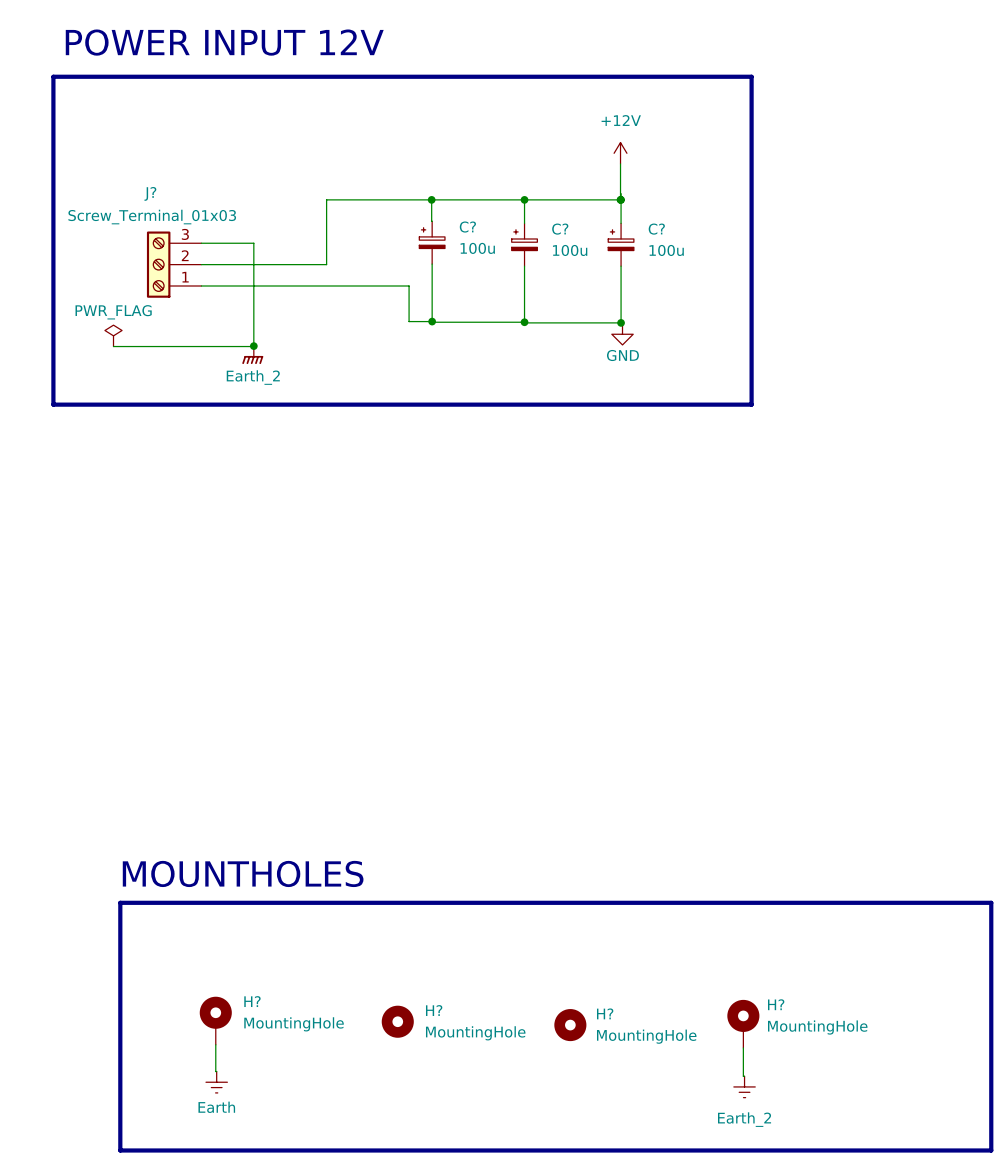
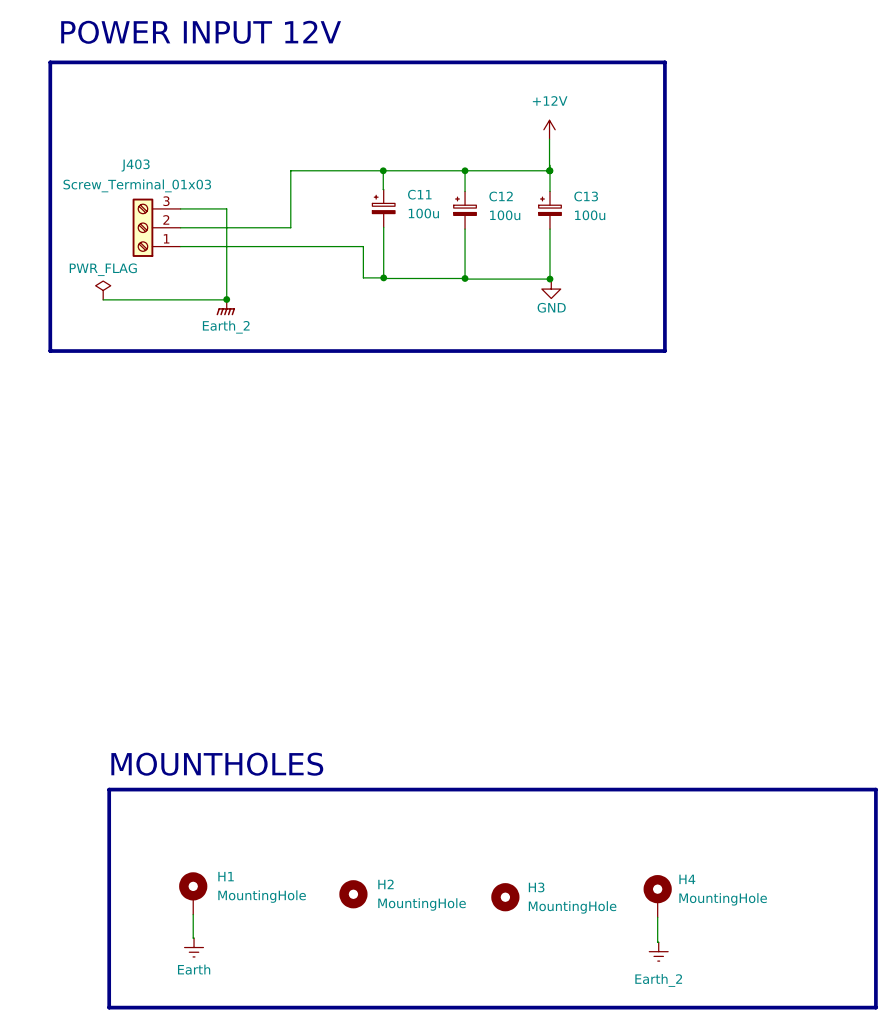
J? name: J? (150, 193) -> J403 (135, 165)
C? name: C? (467, 227) -> C11 (419, 194)
C? name: C? (560, 229) -> C12 (501, 196)
C? name: C? (656, 229) -> C13 (586, 196)
H? name: H? (252, 1001) -> H1 (226, 876)
H? name: H? (776, 1004) -> H4 (687, 879)
H? name: H? (434, 1010) -> H2 (385, 884)
H? name: H? (605, 1013) -> H3 (536, 887)

